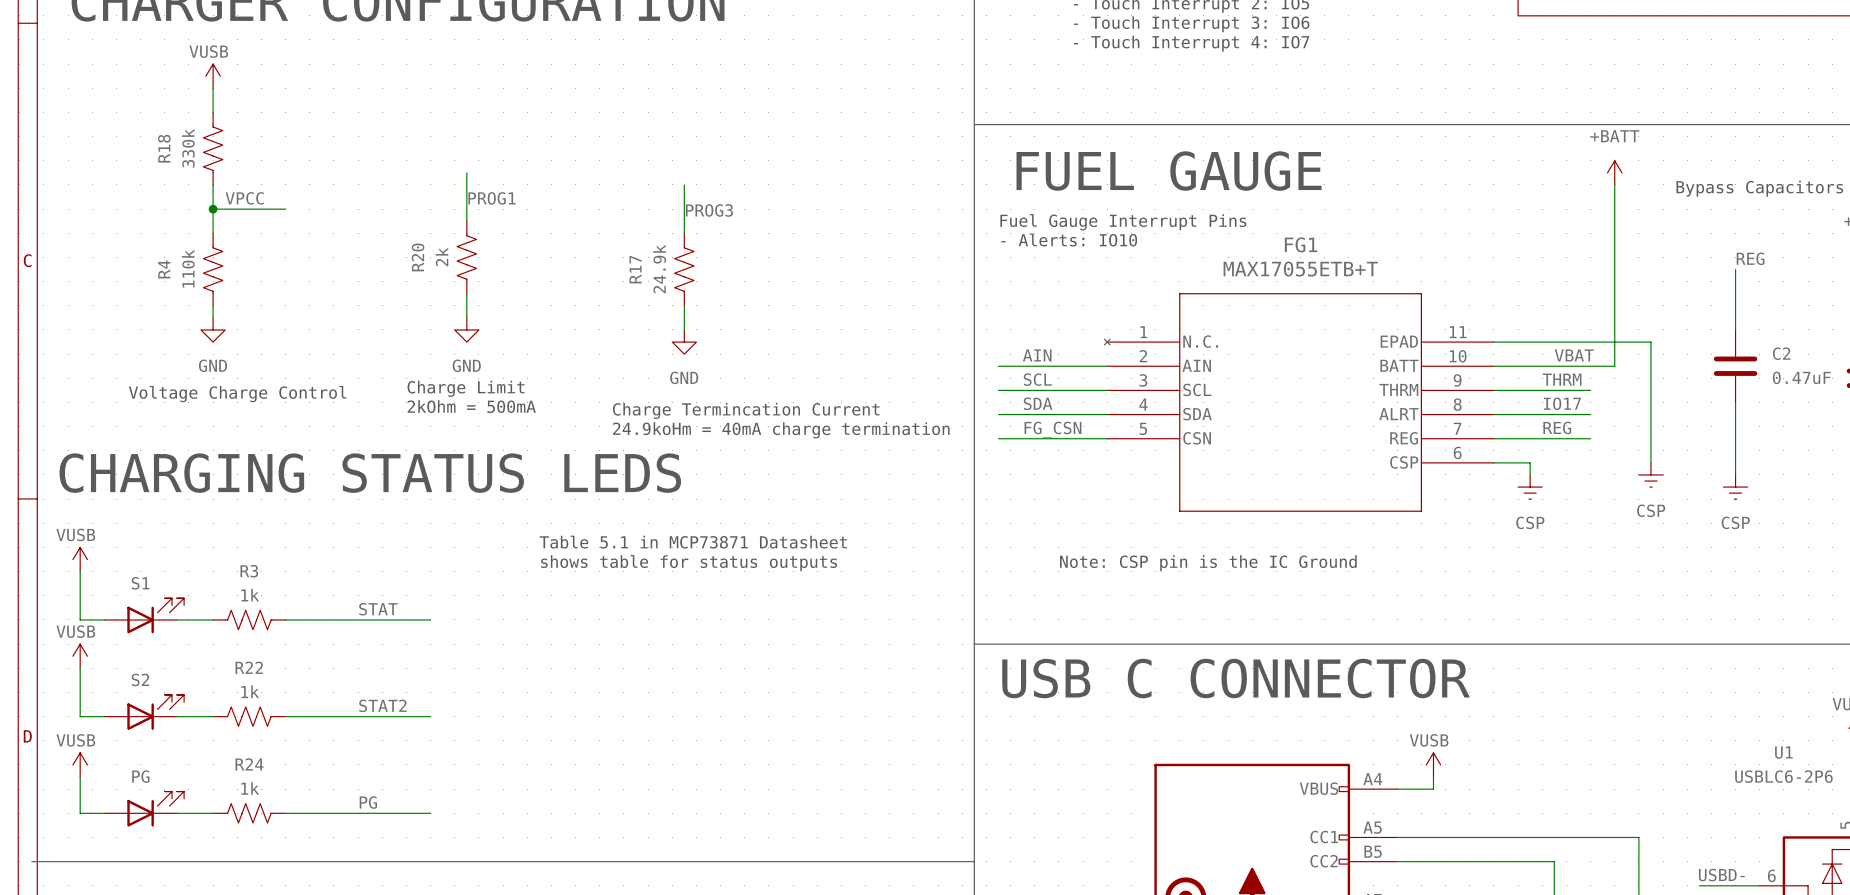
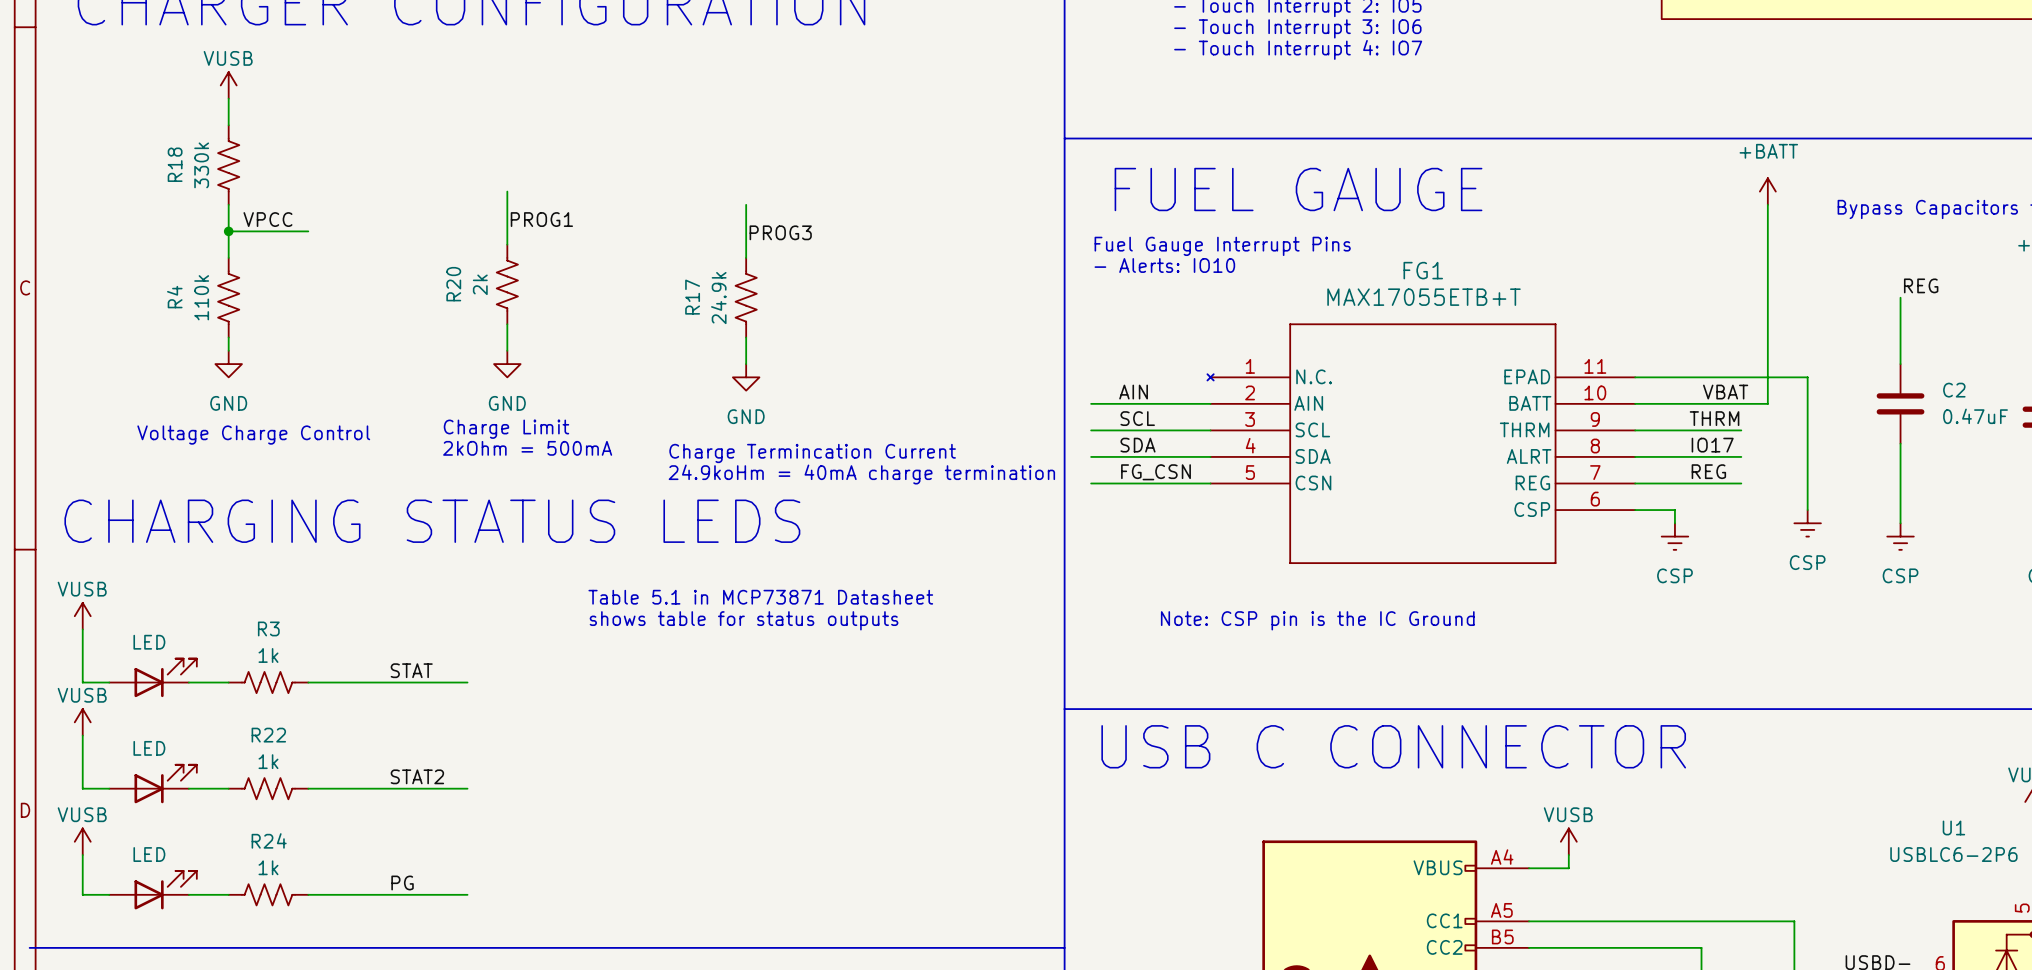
part value: S1 (140, 583) -> LED (149, 642)
part value: S2 (140, 679) -> LED (149, 748)
part value: PG (140, 776) -> LED (149, 854)

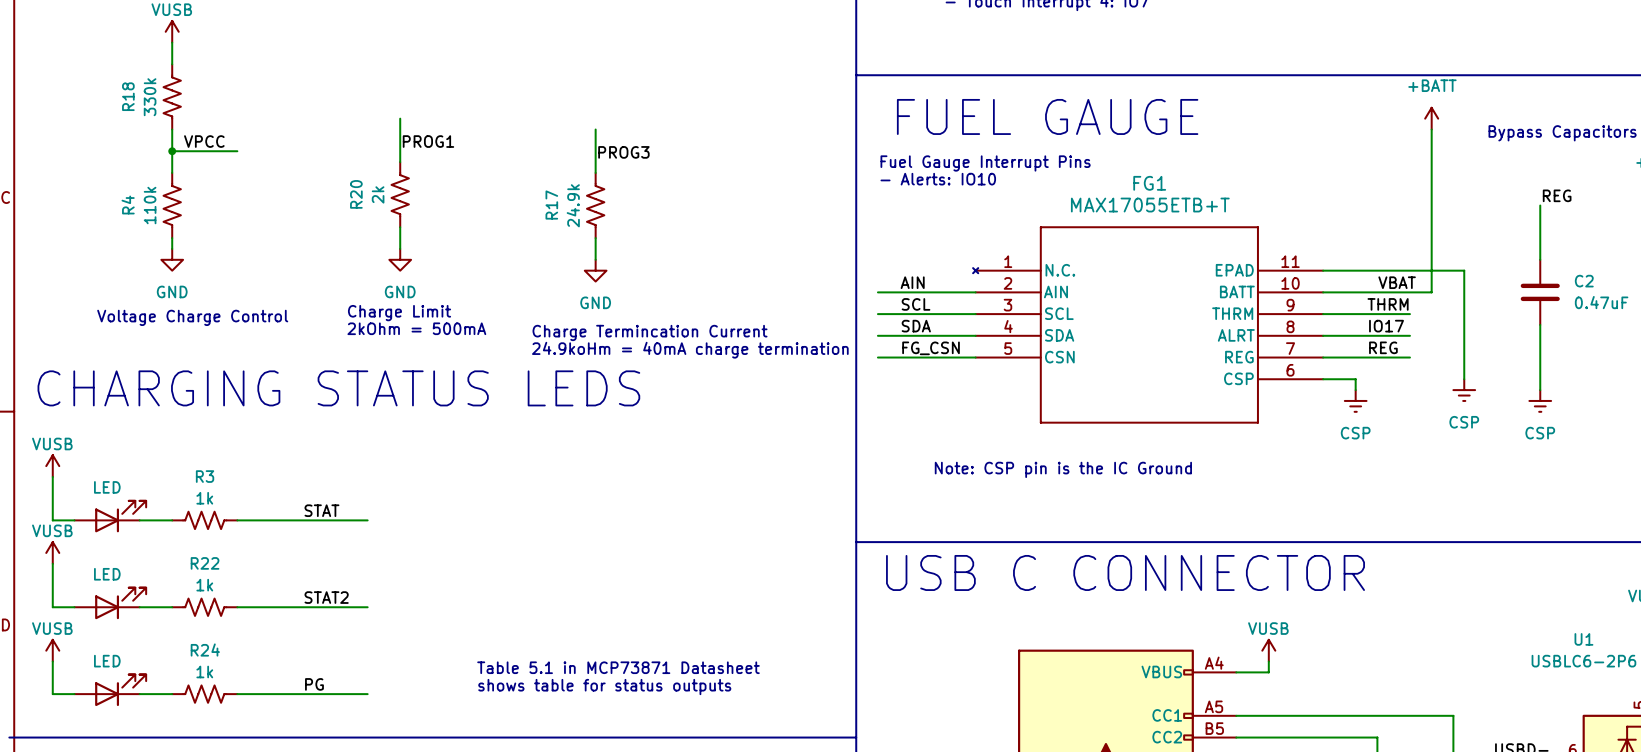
text: Table 5.1 in MCP73871 Datasheet (760, 597) -> none
text: shows table for status outputs (744, 620) -> none
text: none -> Table 5.1 in MCP73871 Datasheet (618, 667)
text: none -> shows table for status outputs (604, 687)

